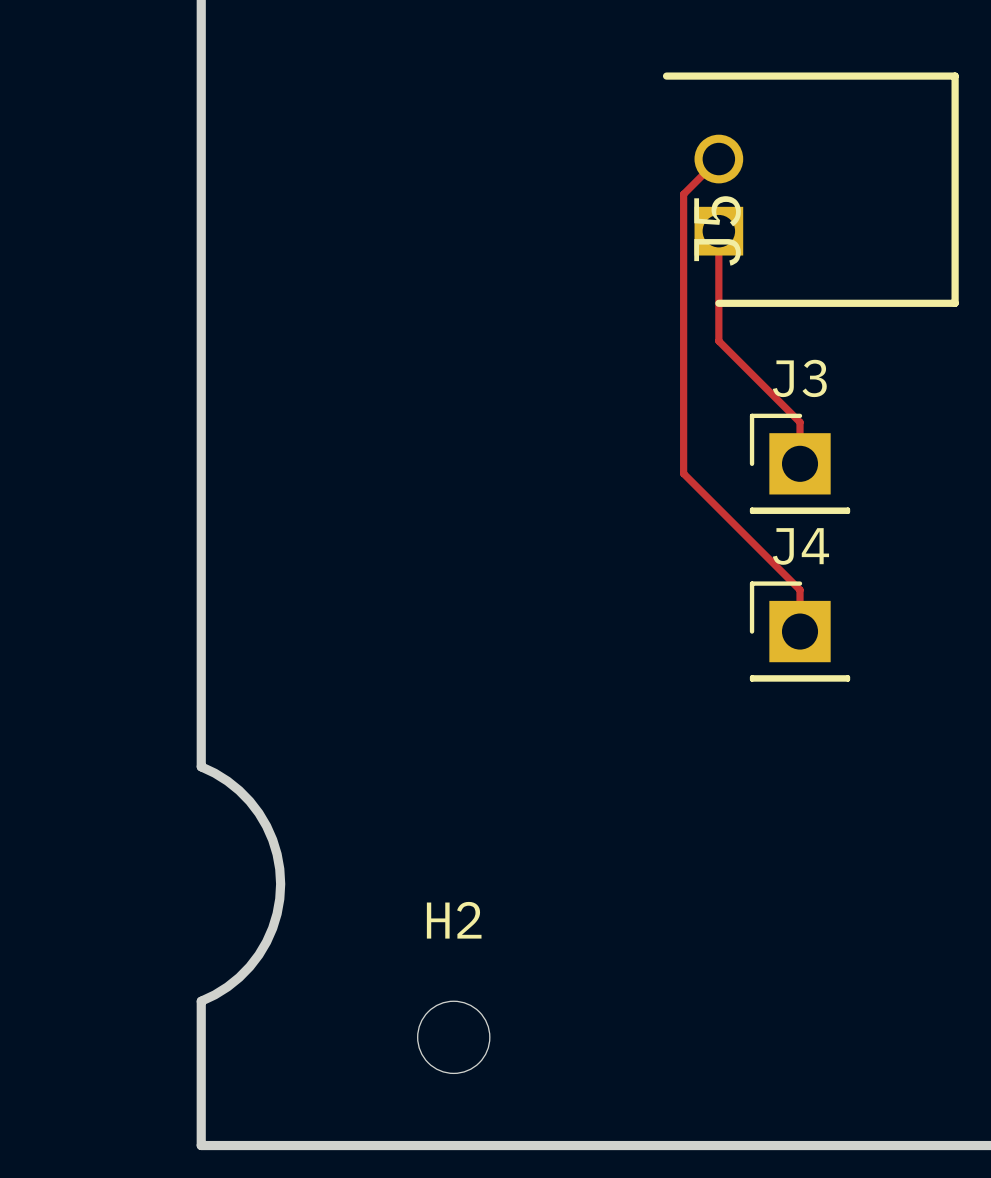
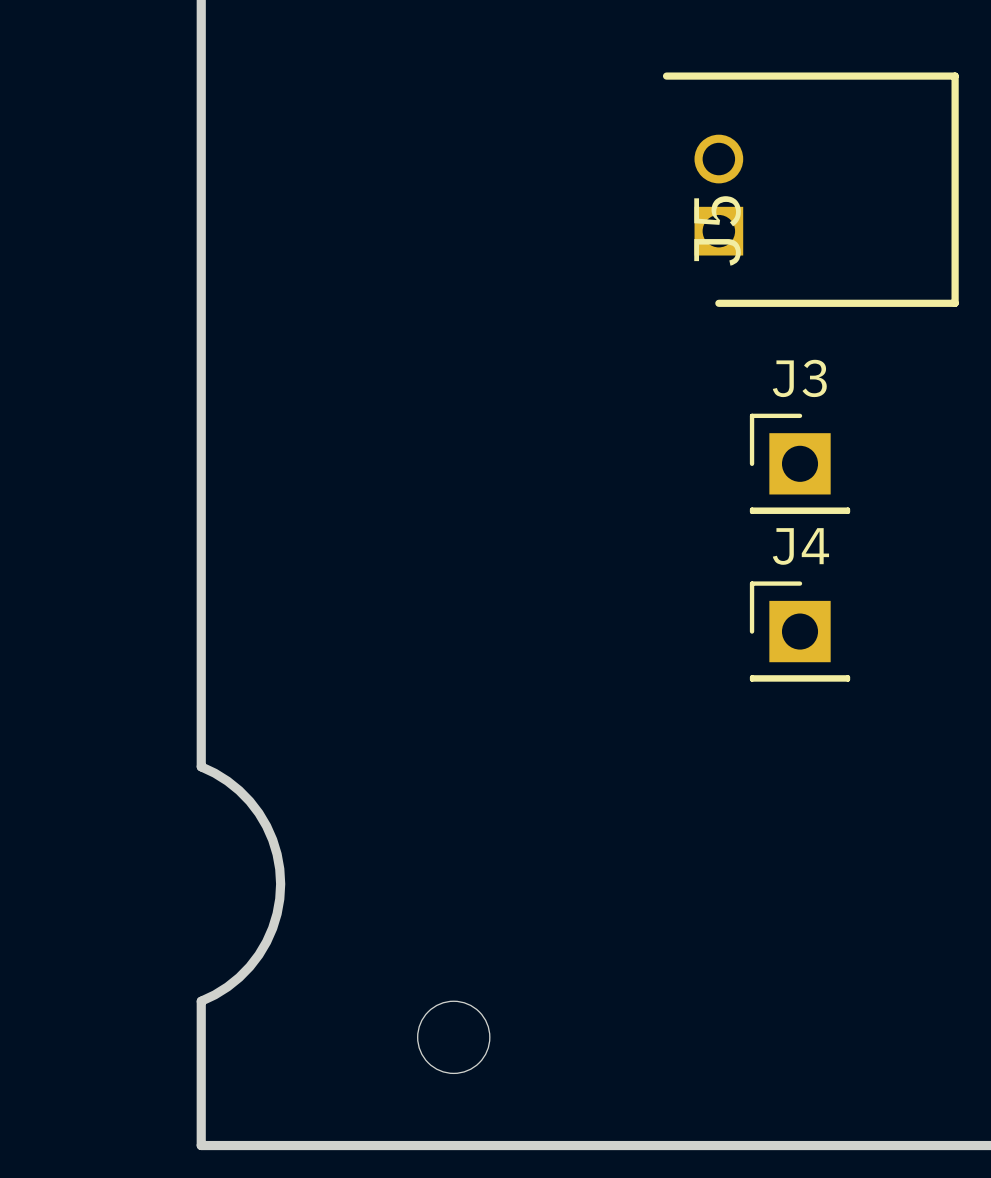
top track: (718, 159) (683, 194) (683, 473) (800, 590) (800, 631) -> none
top track: (718, 231) (718, 341) (800, 422) (800, 463) -> none
H2 name: H2 (454, 920) -> none

